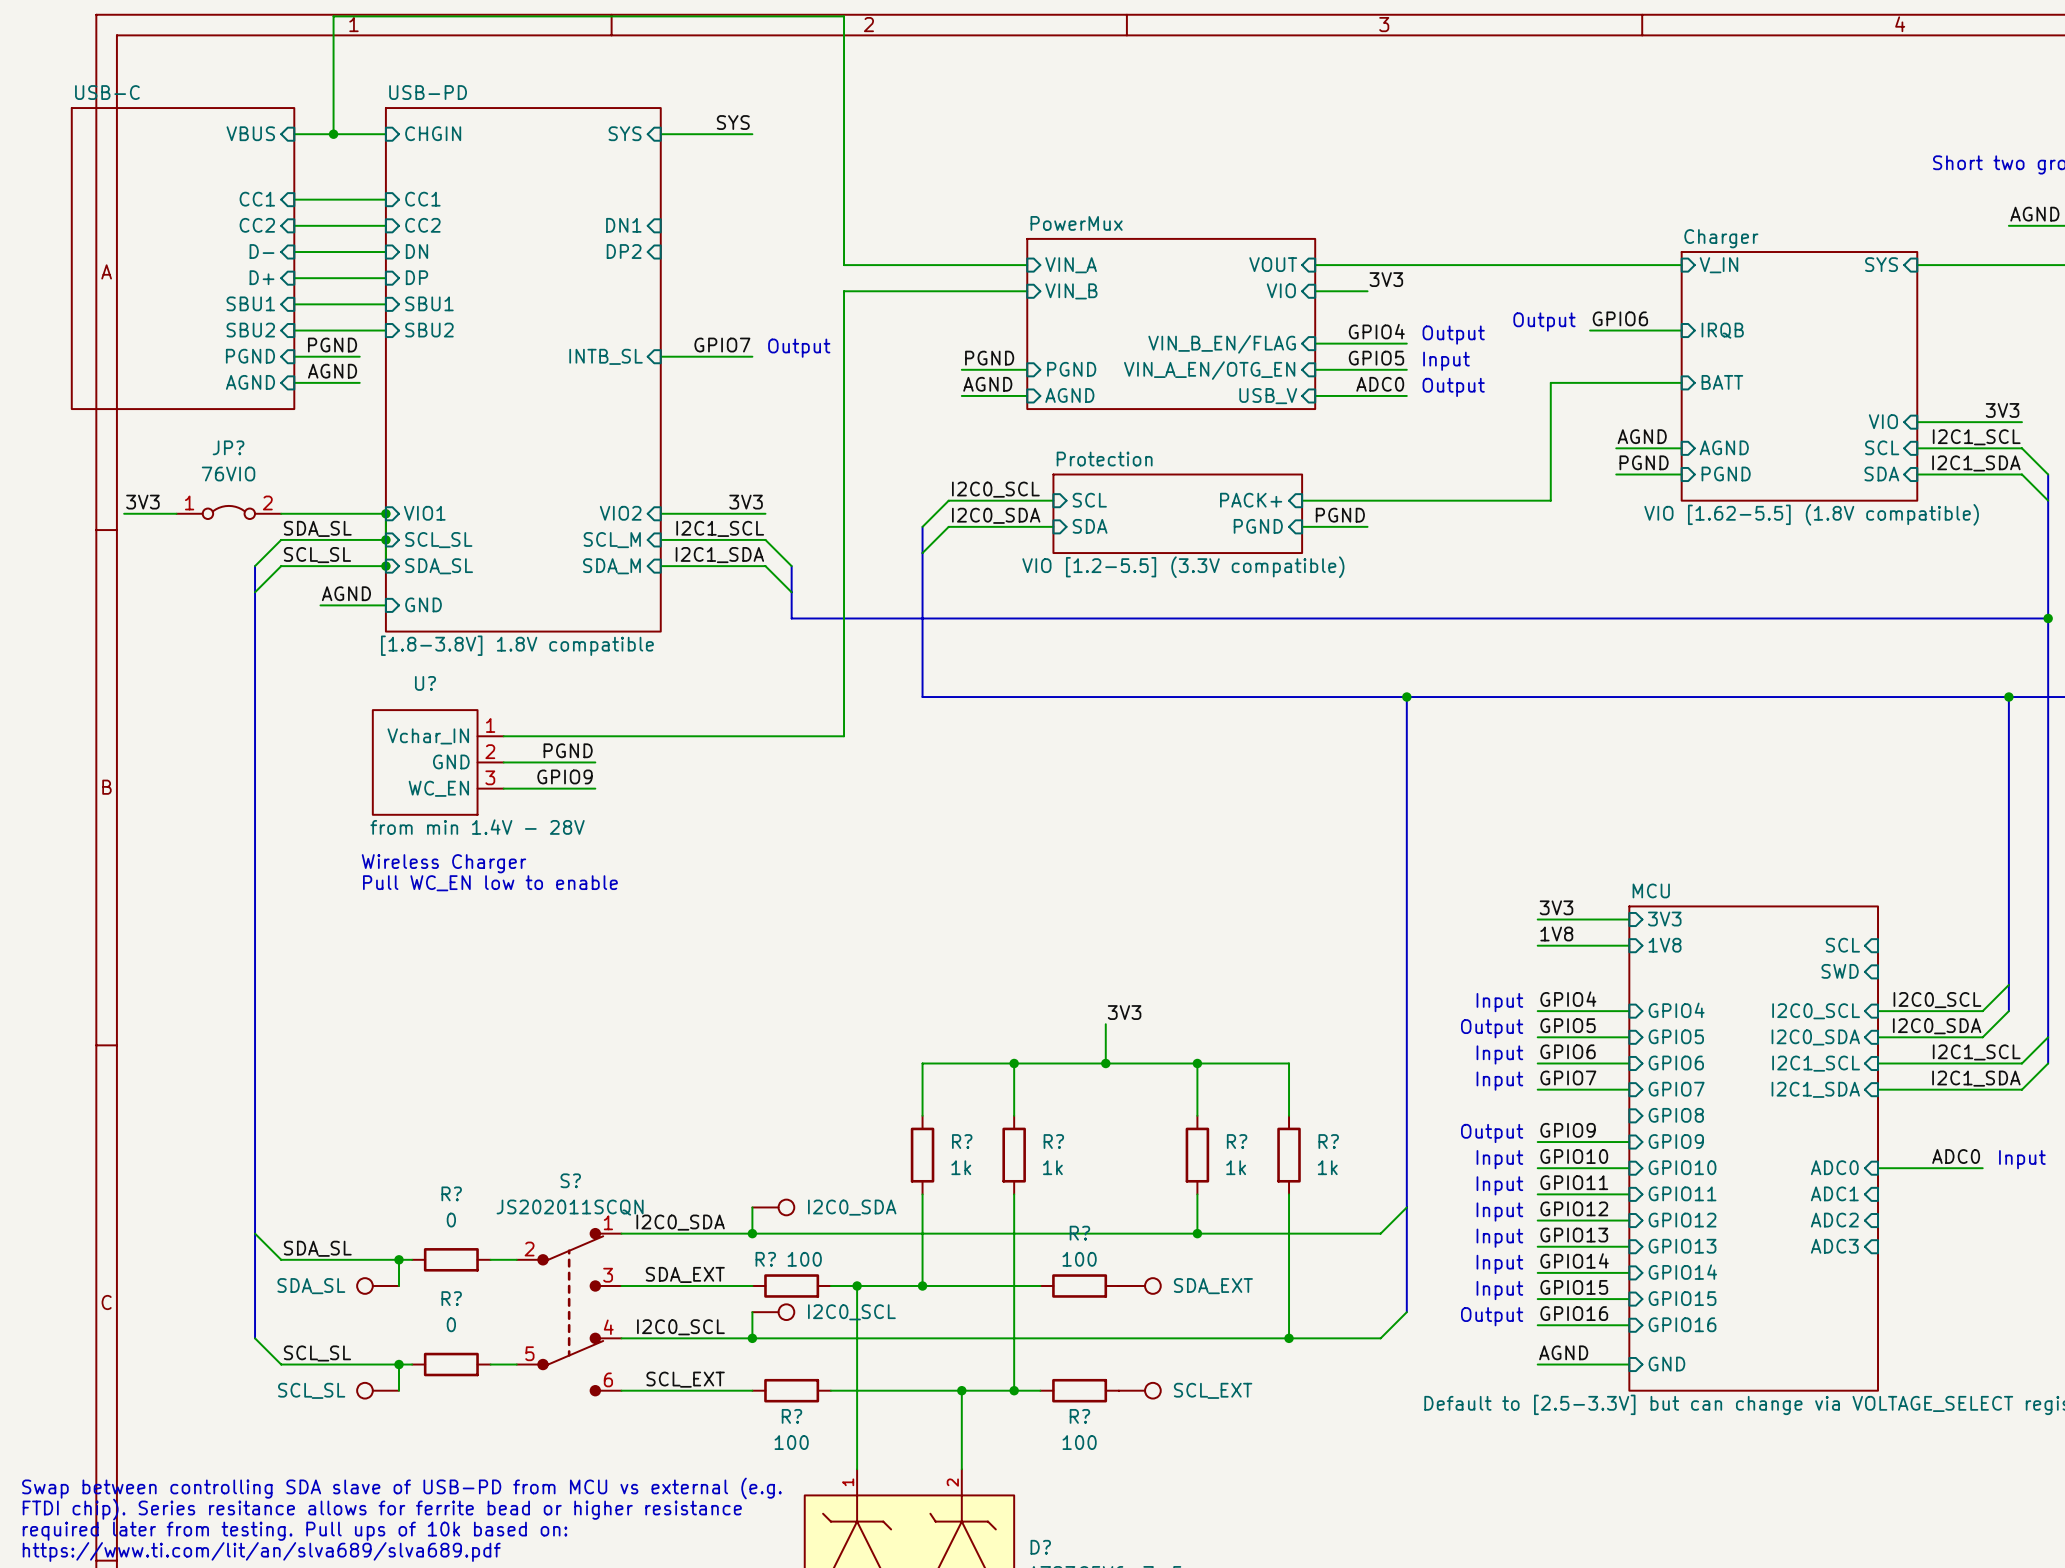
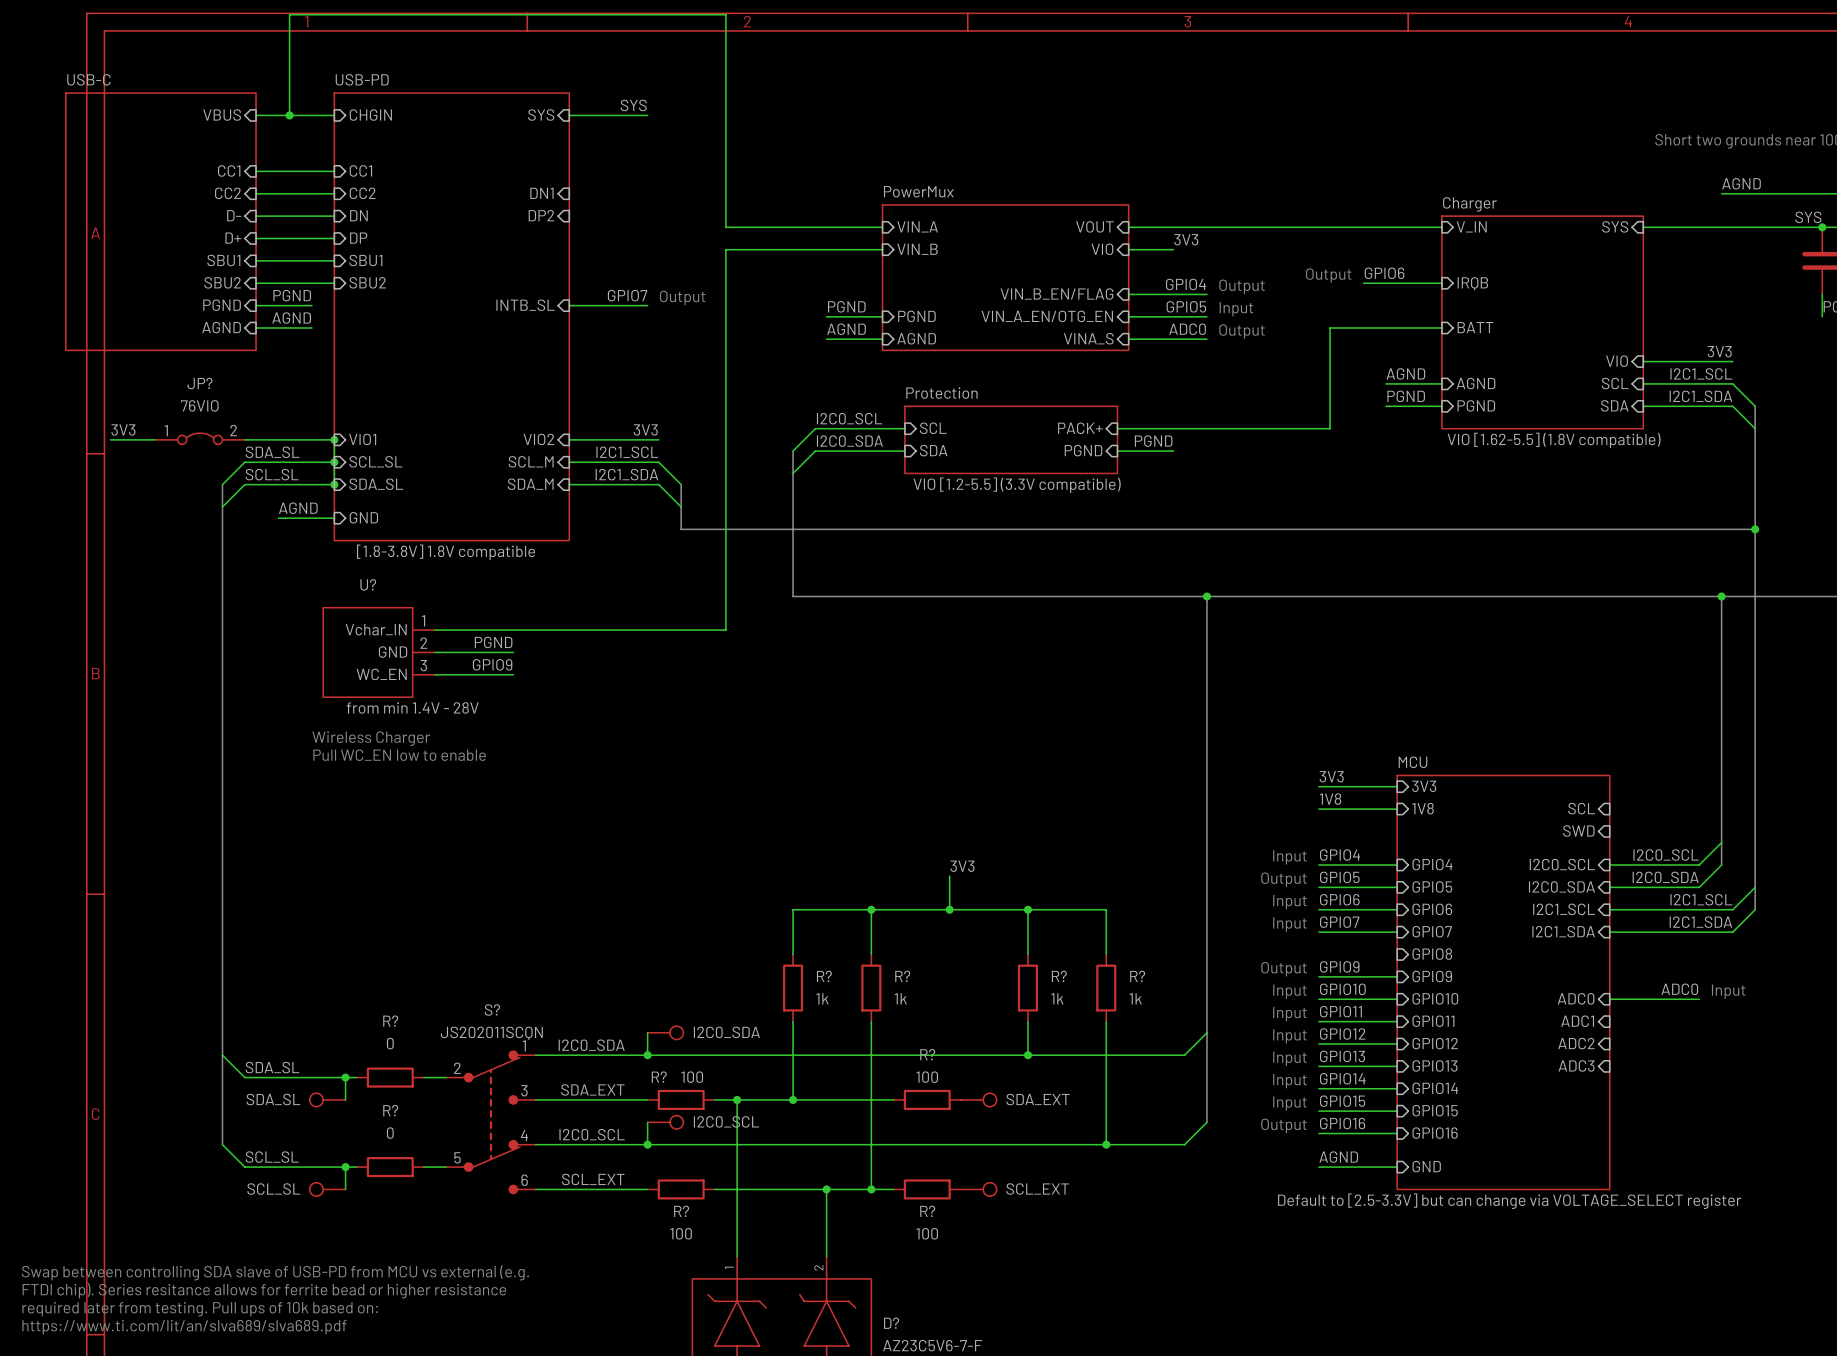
sheet pin: USB_V (1268, 396) -> VINA_S (1088, 338)

